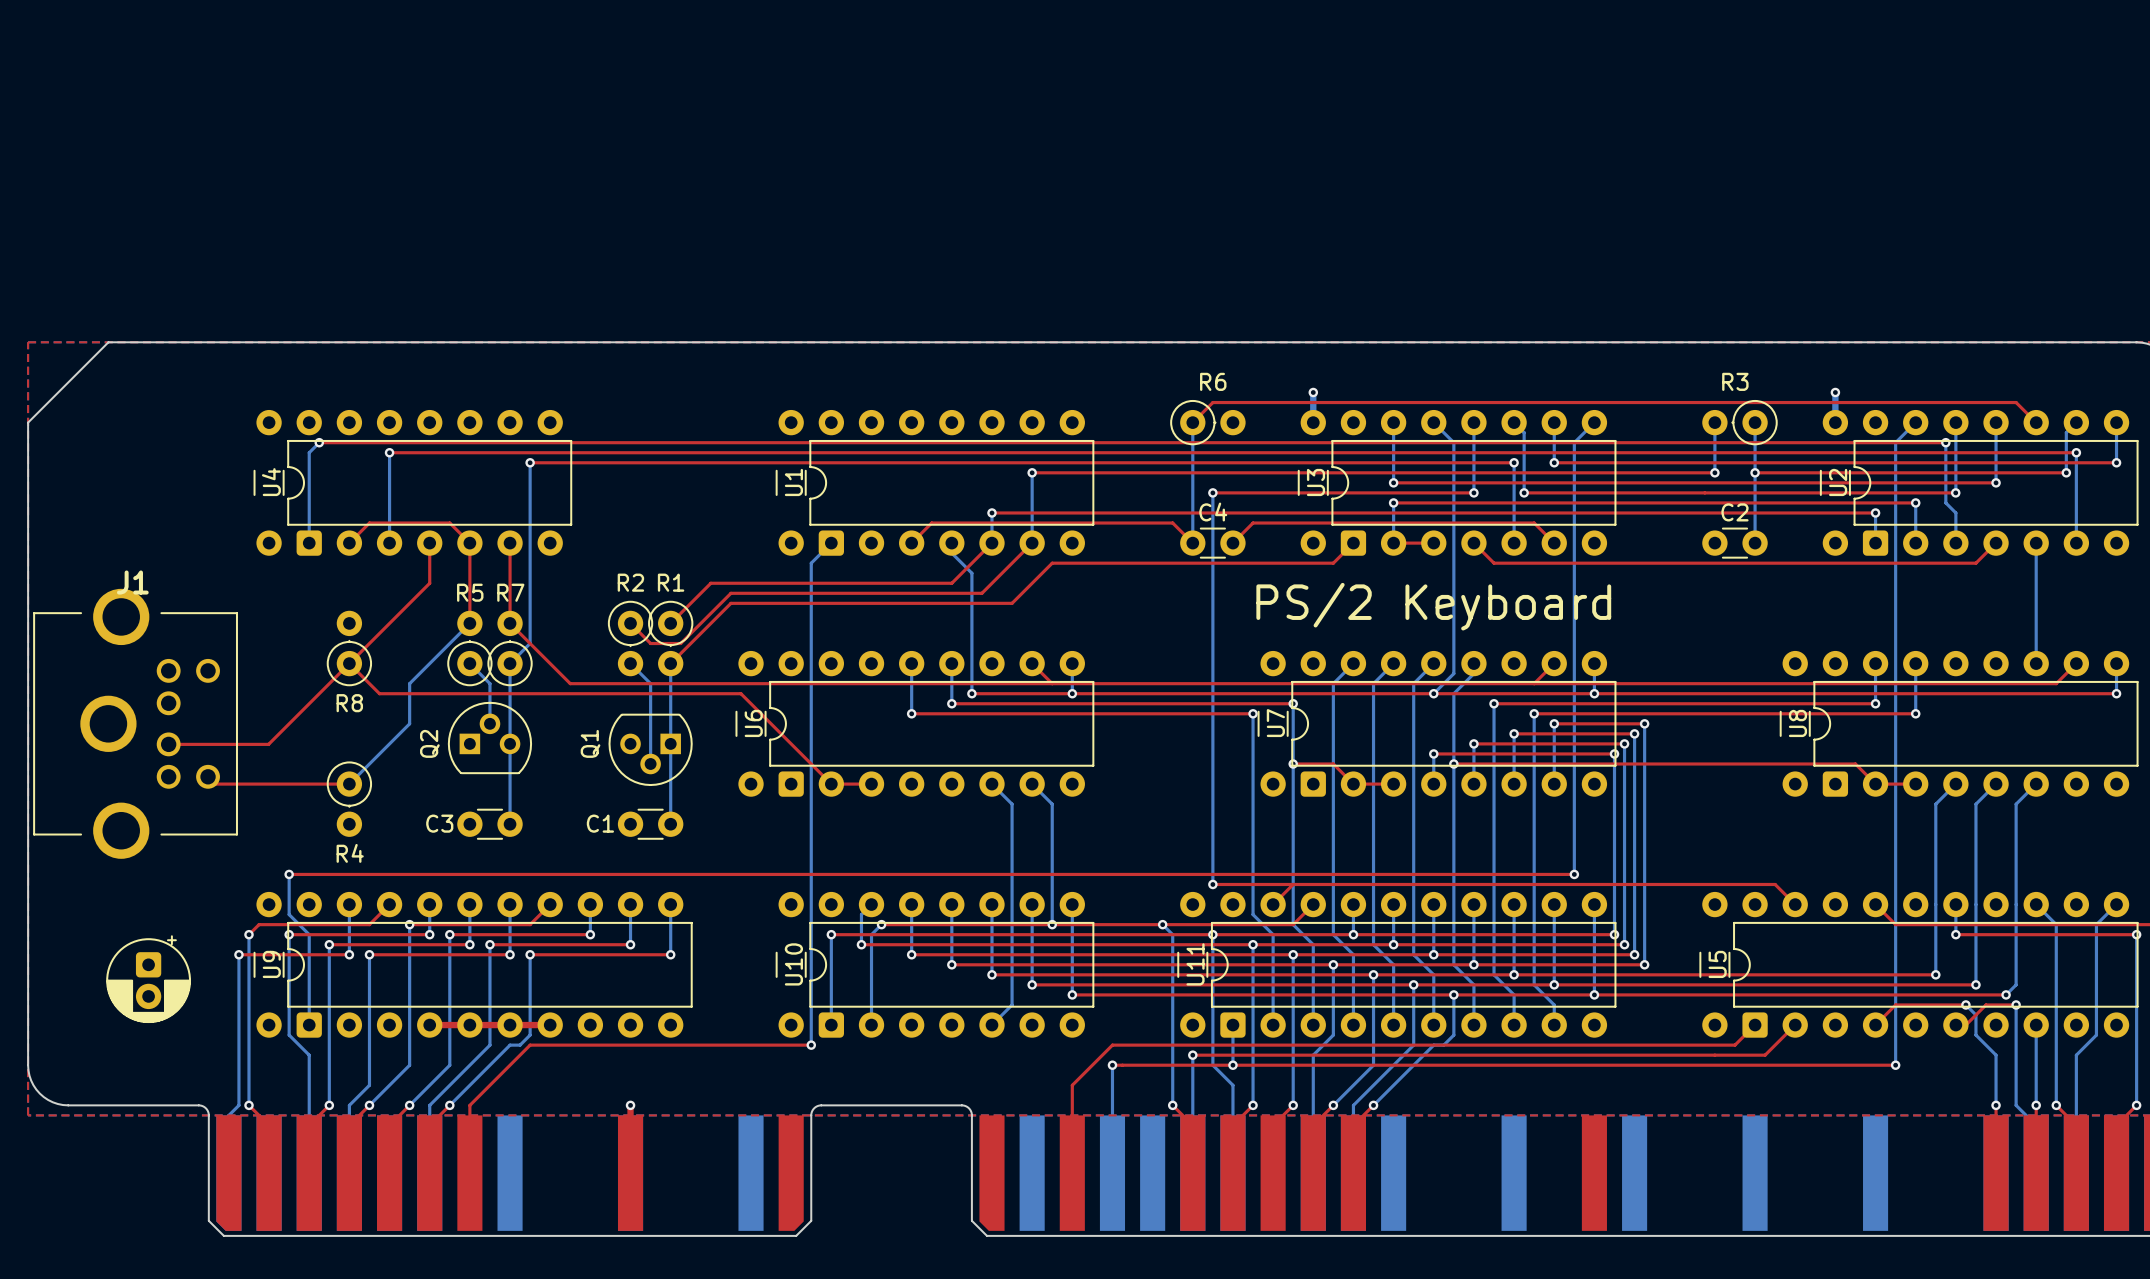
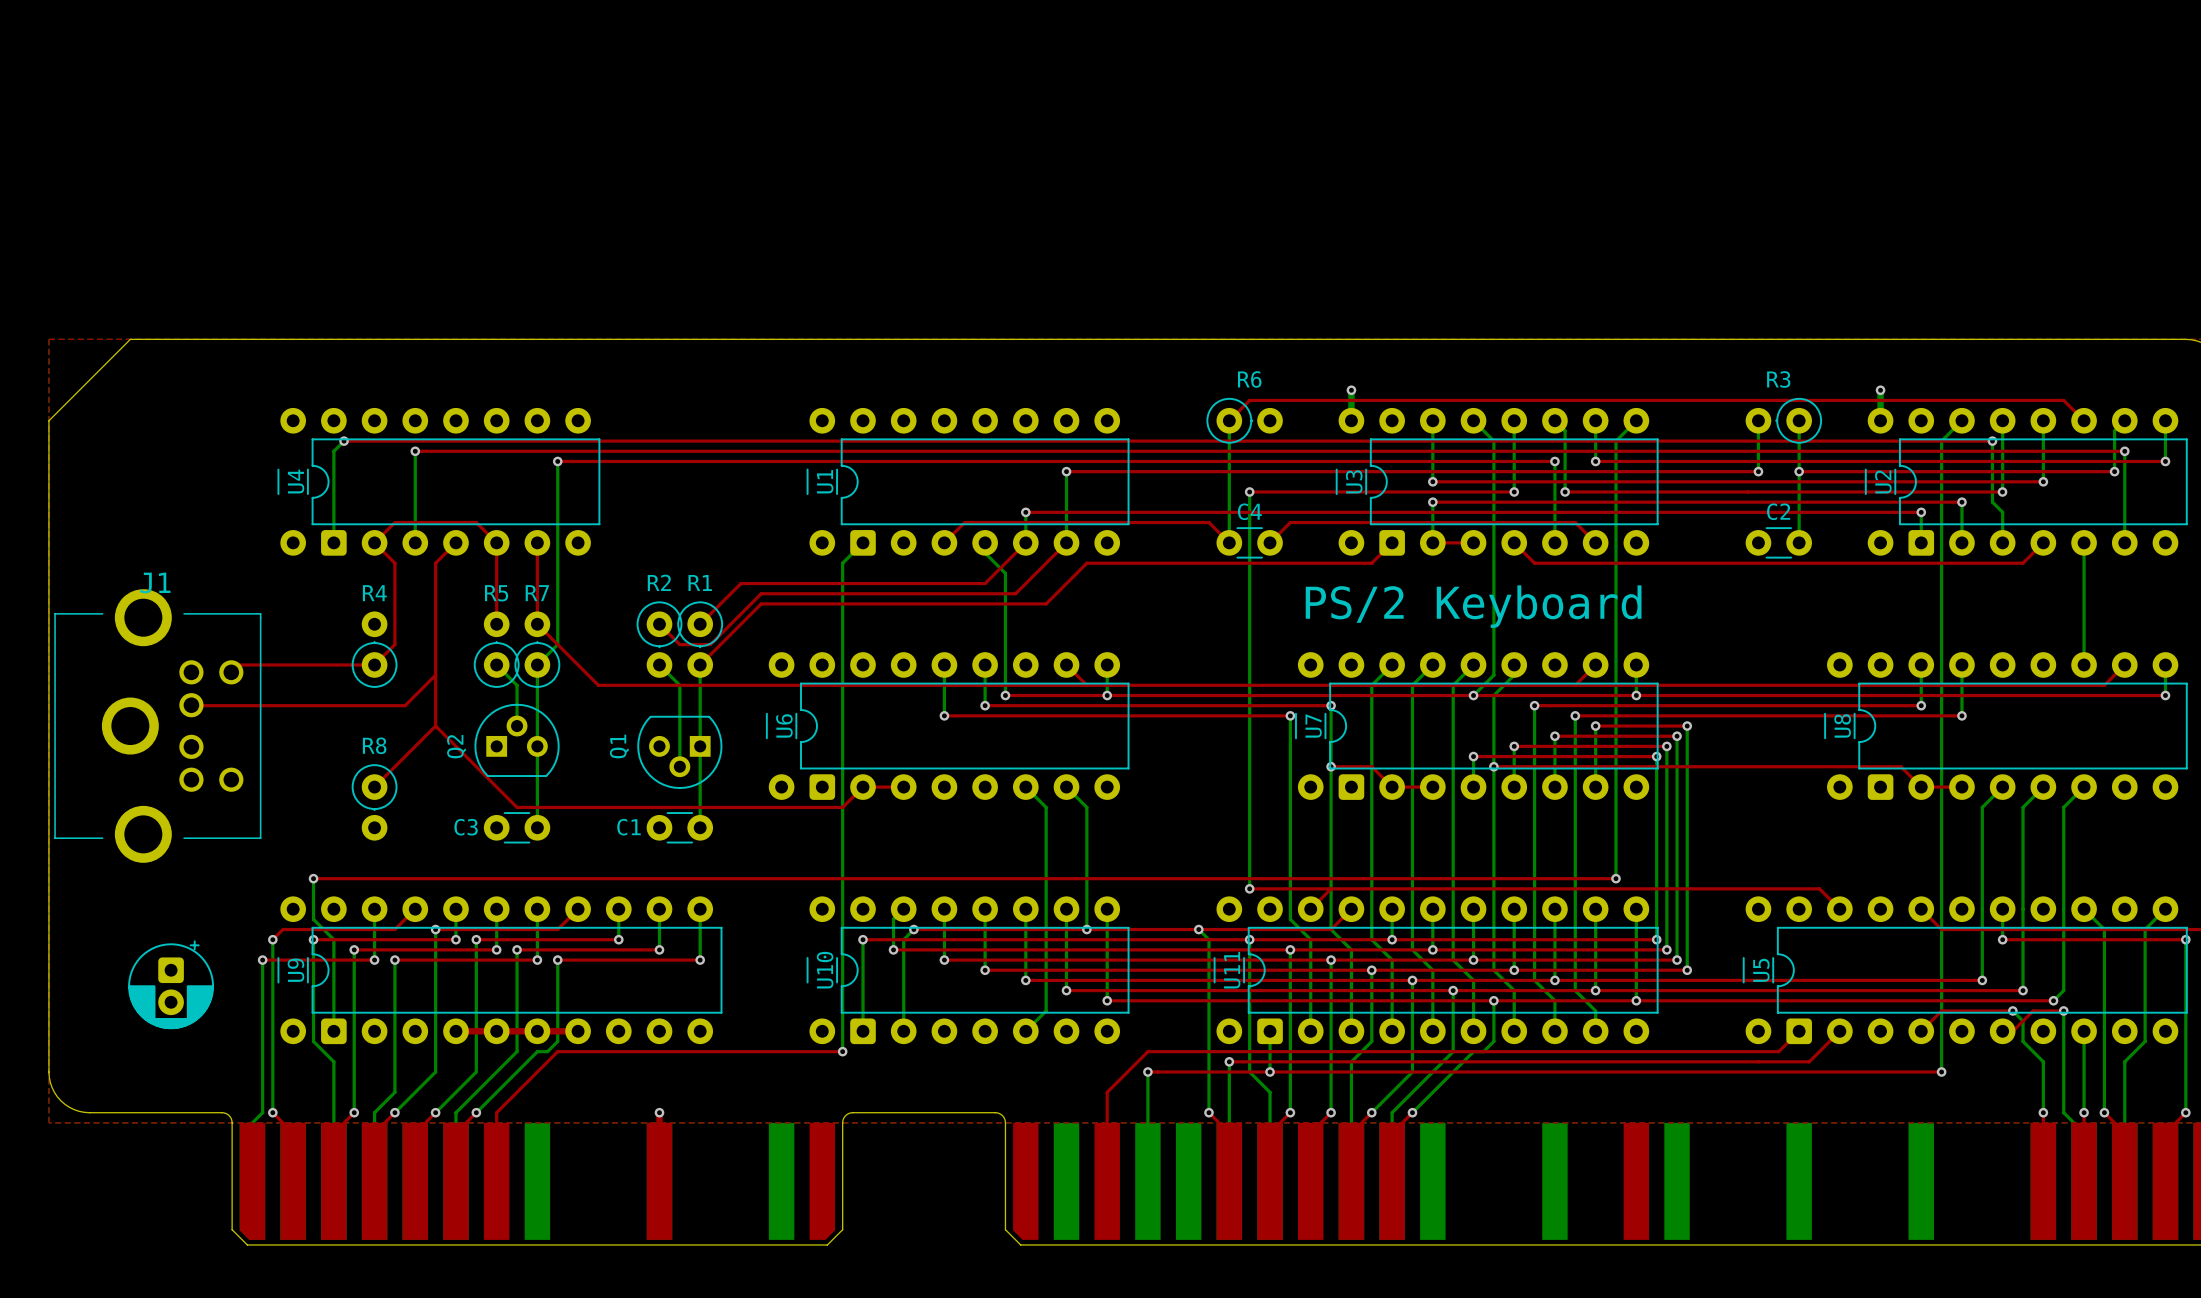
top track: (429, 543) (429, 583) (369, 643) -> (374, 542) (394, 563) (394, 644)
top track: none -> (455, 542) (435, 563) (435, 726)
bottom track: (469, 623) (409, 683) (409, 723) (349, 784) -> none
top track: none -> (374, 664) (238, 664) (231, 672)
top track: none -> (435, 675) (405, 705) (191, 705)
R8 name: R8 (349, 703) -> R4 (374, 593)
top track: (168, 744) (268, 744) (349, 663) (379, 693) (740, 693) (831, 784) -> (435, 726) (517, 807) (842, 807) (863, 787)
top track: (208, 776) (215, 784) (349, 784) -> (435, 726) (374, 787)
R4 name: R4 (350, 853) -> R8 (374, 745)

